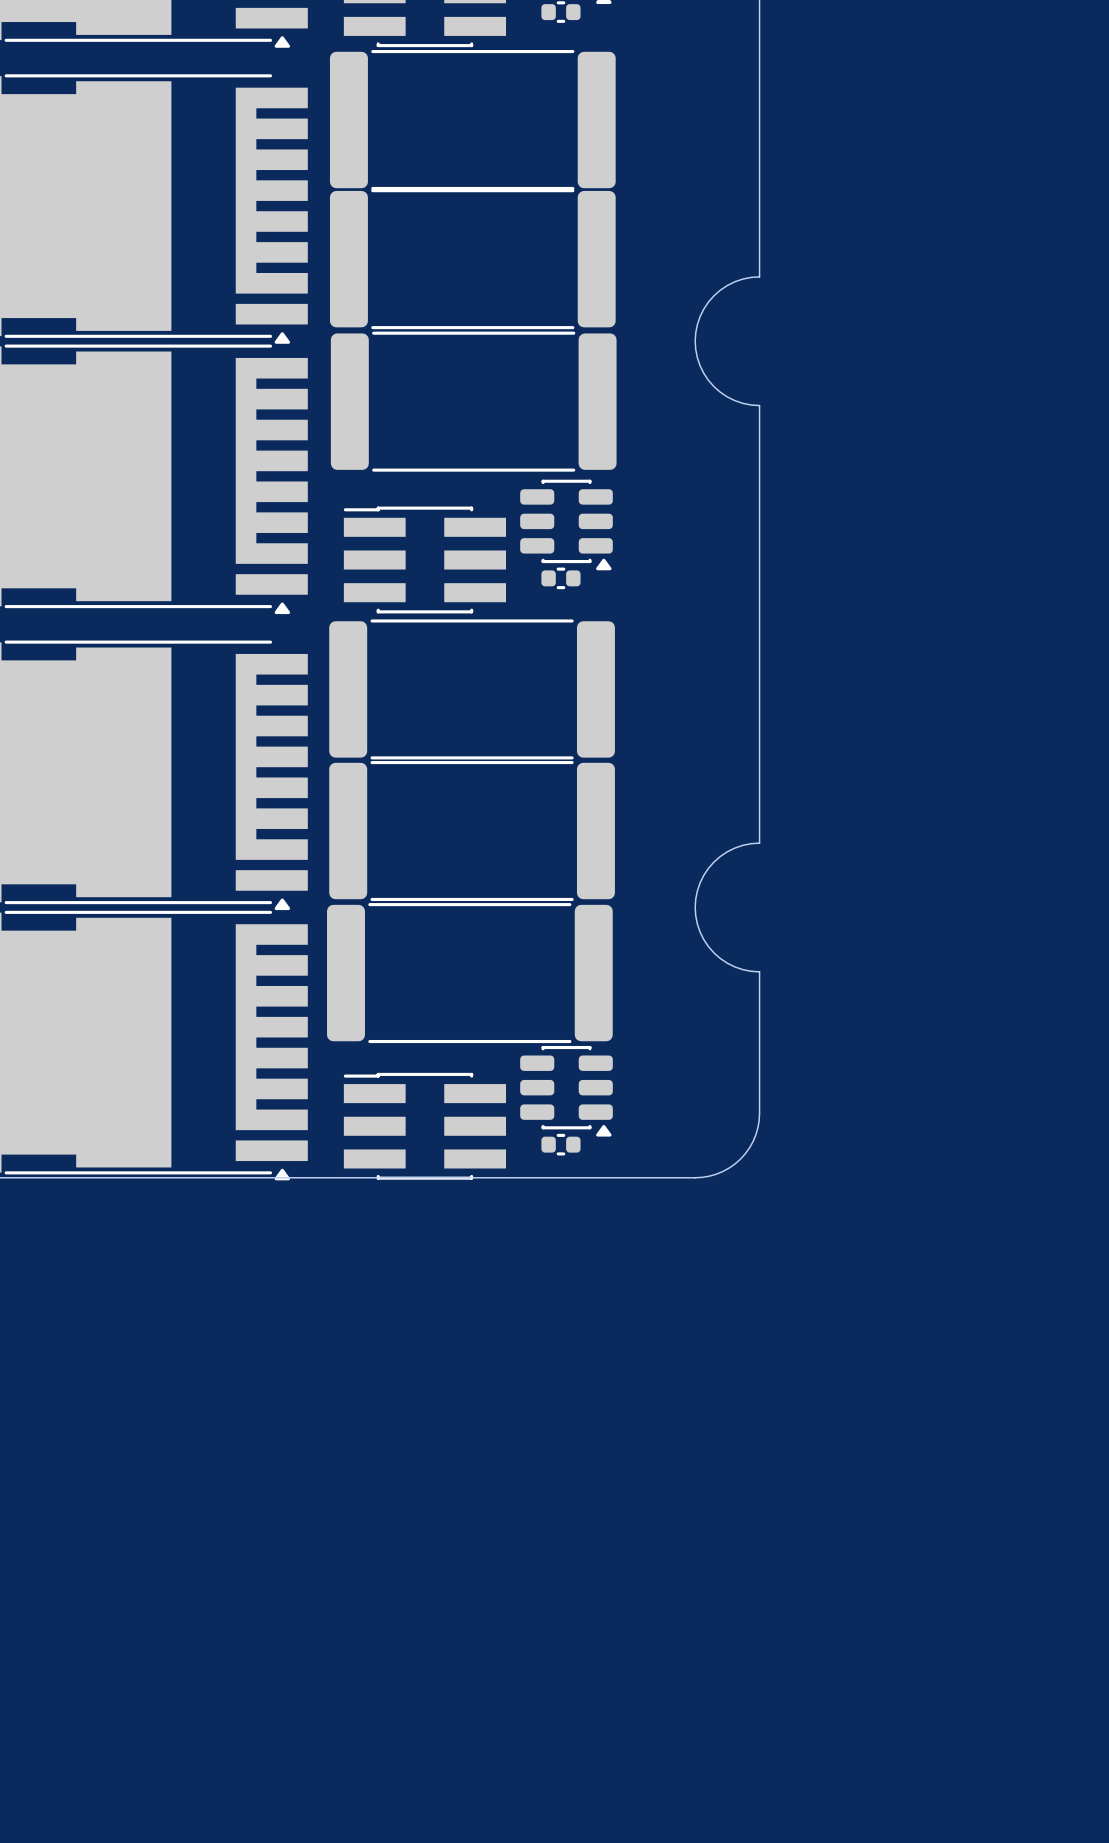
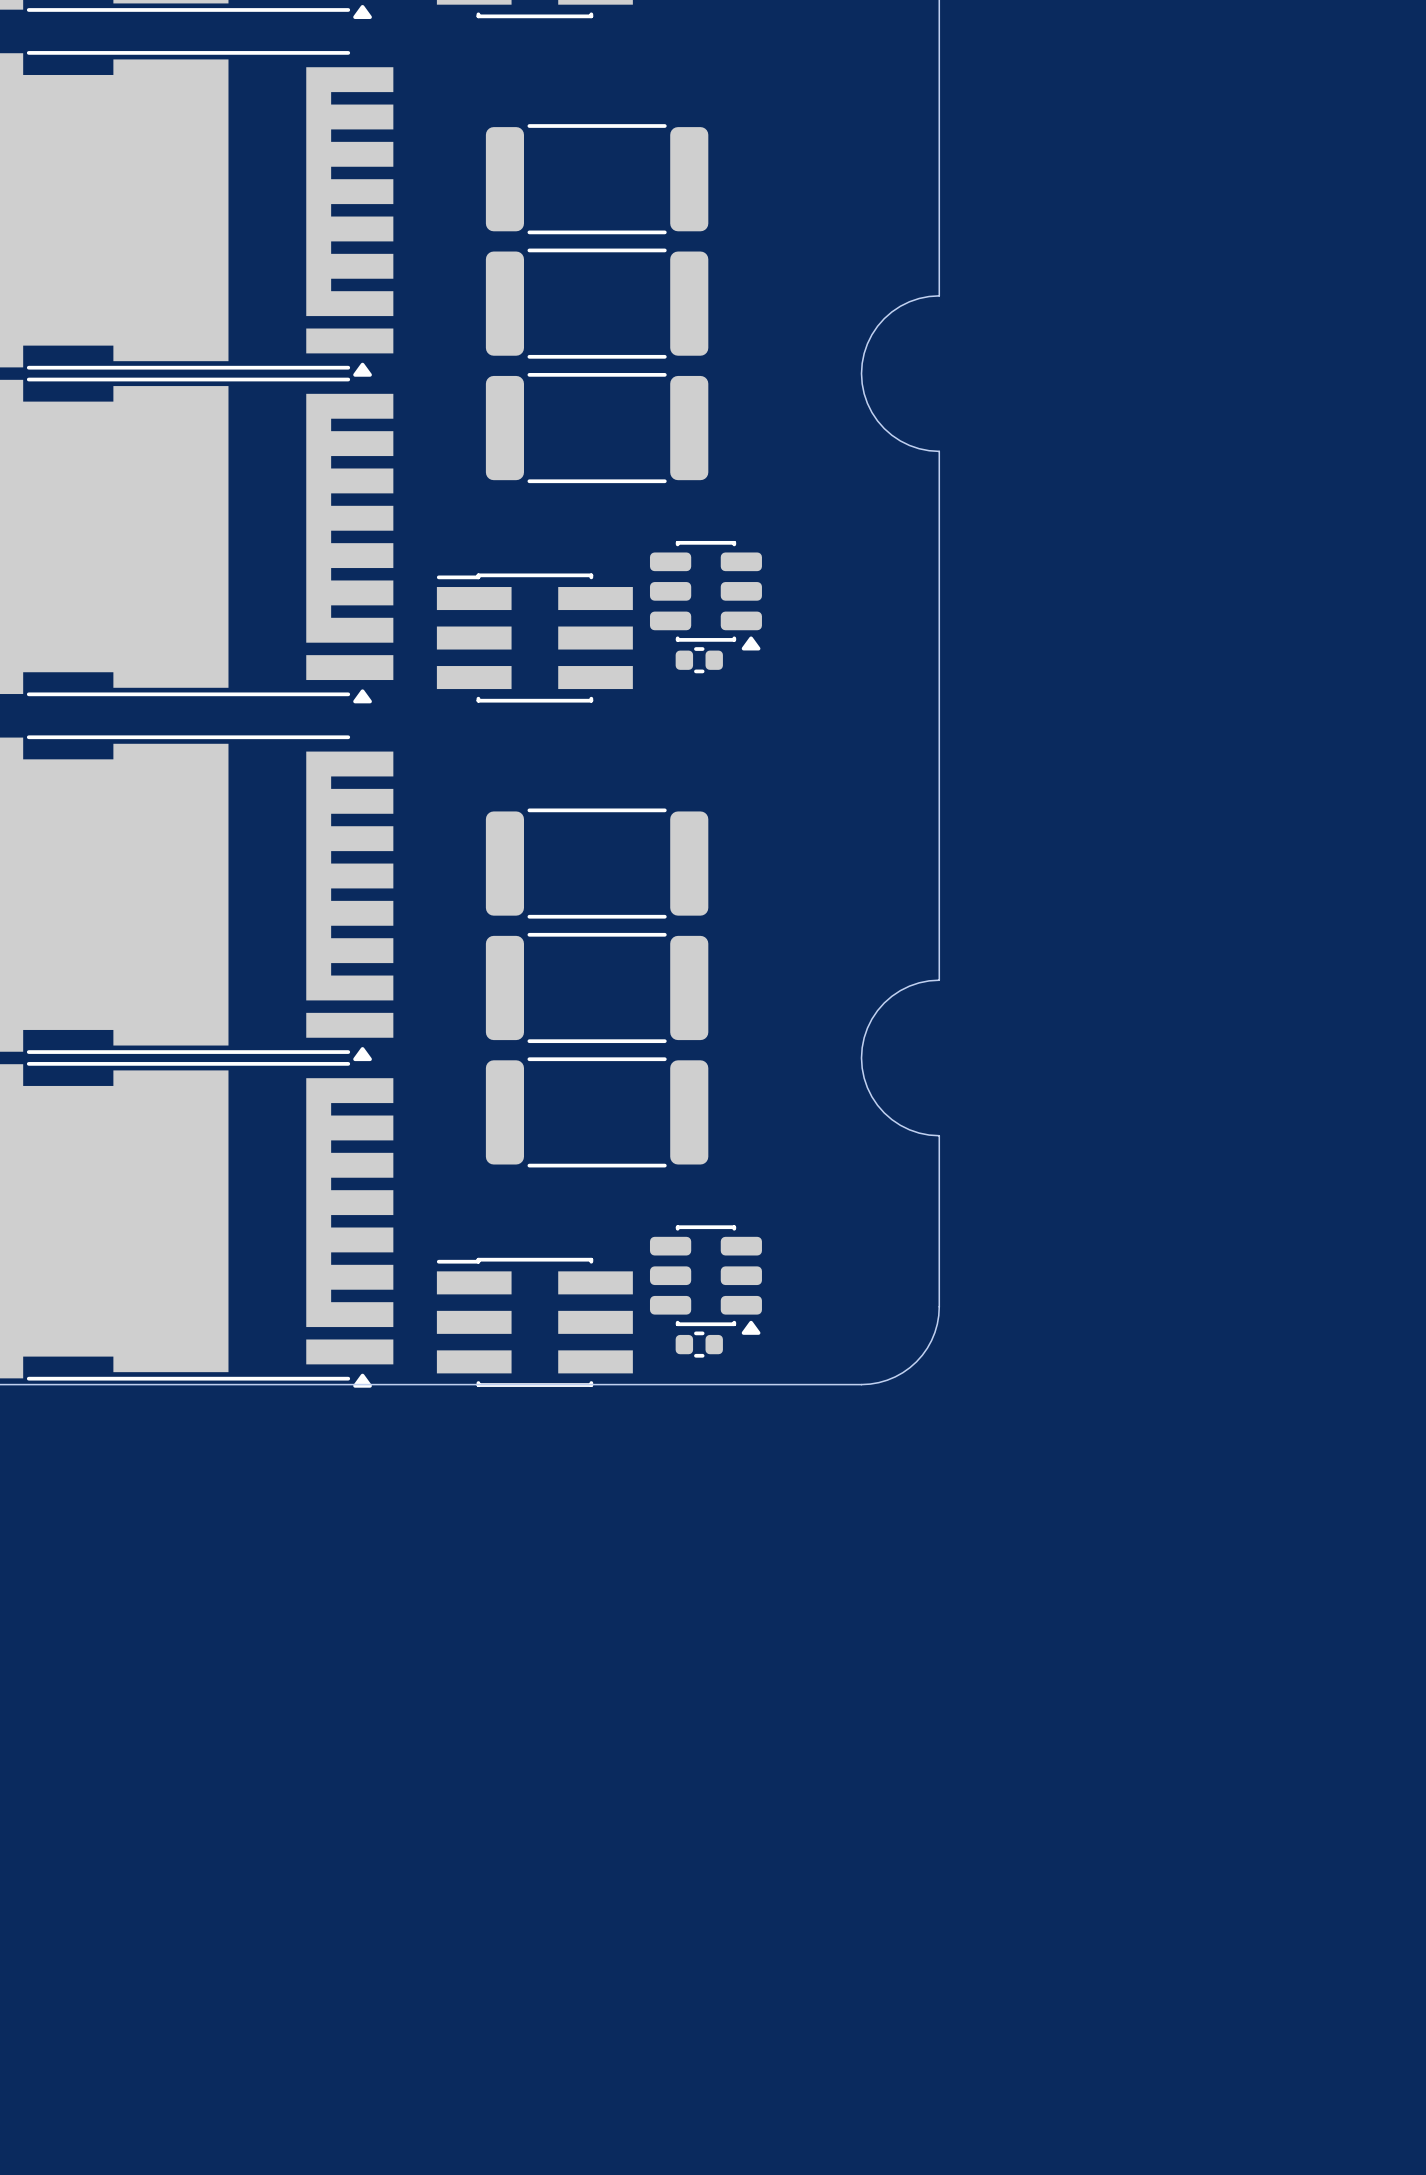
part: (472, 120) -> none
part: none -> (597, 179)
part footprint: [329, 189, 616, 330] -> [485, 248, 709, 359]
part footprint: [330, 331, 617, 472] -> [485, 372, 709, 484]
part: (472, 689) -> none
part: none -> (597, 863)
part footprint: [329, 760, 615, 902] -> [485, 932, 709, 1044]
part footprint: [327, 903, 613, 1044] -> [485, 1057, 709, 1168]

